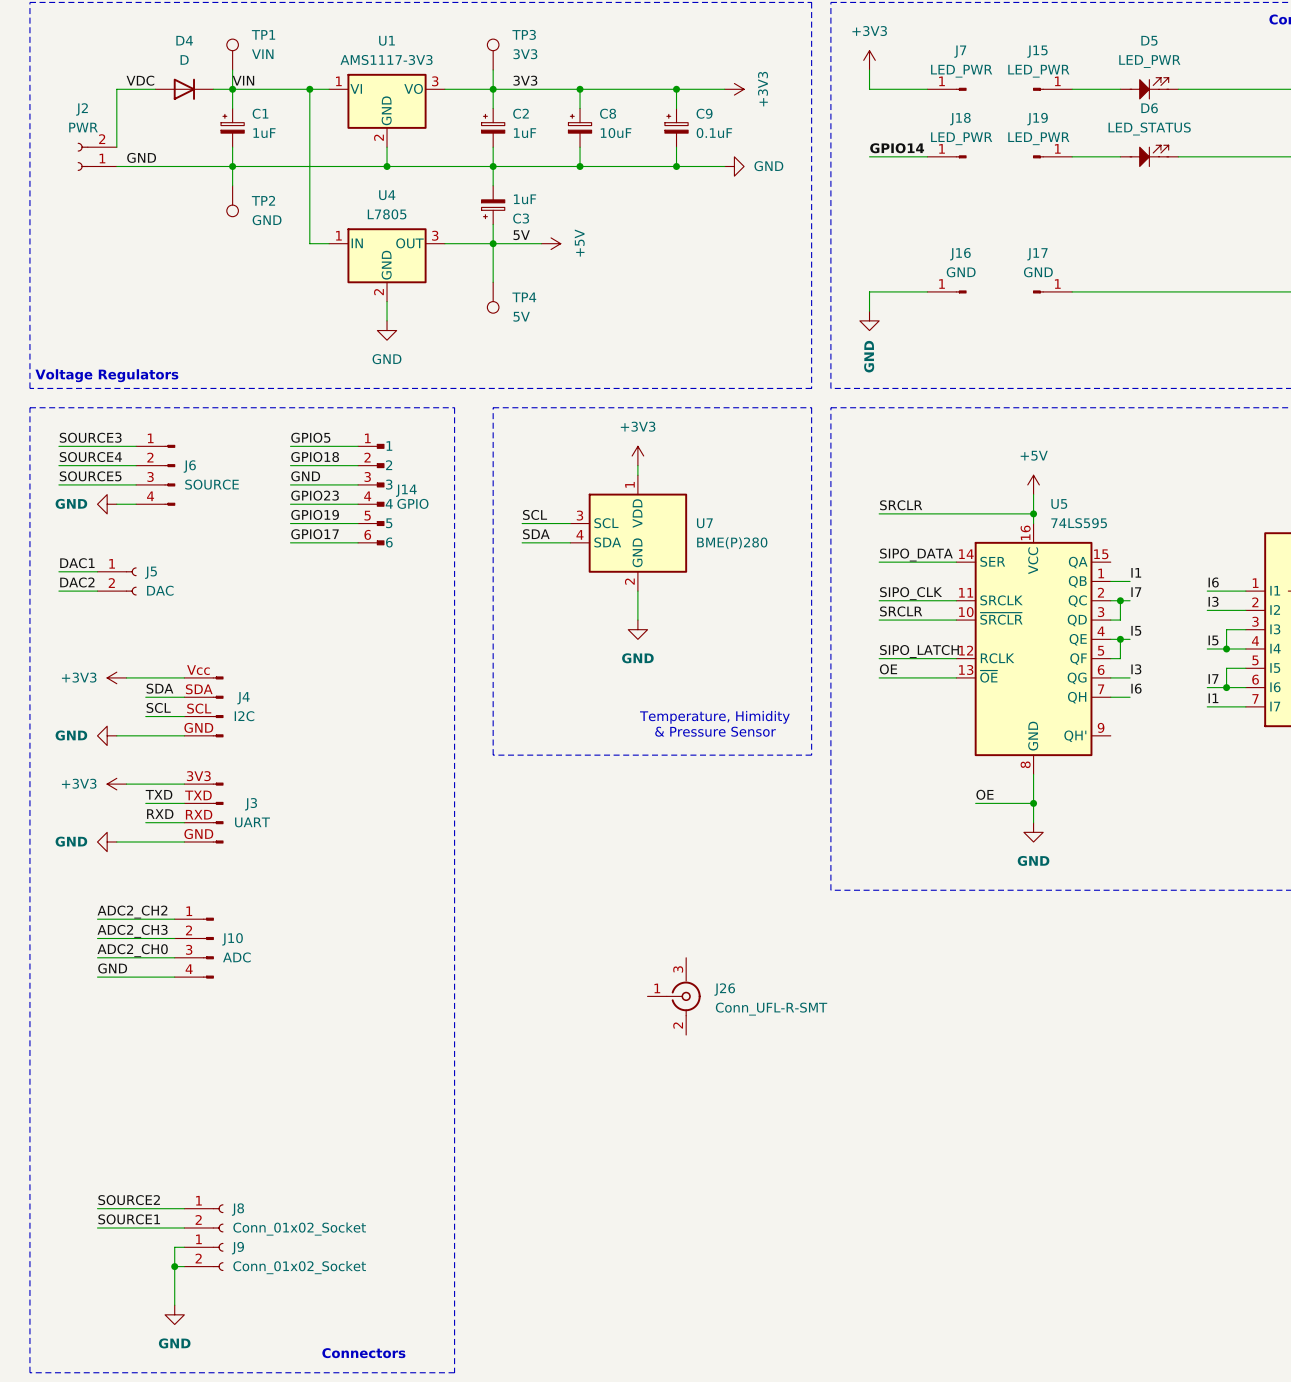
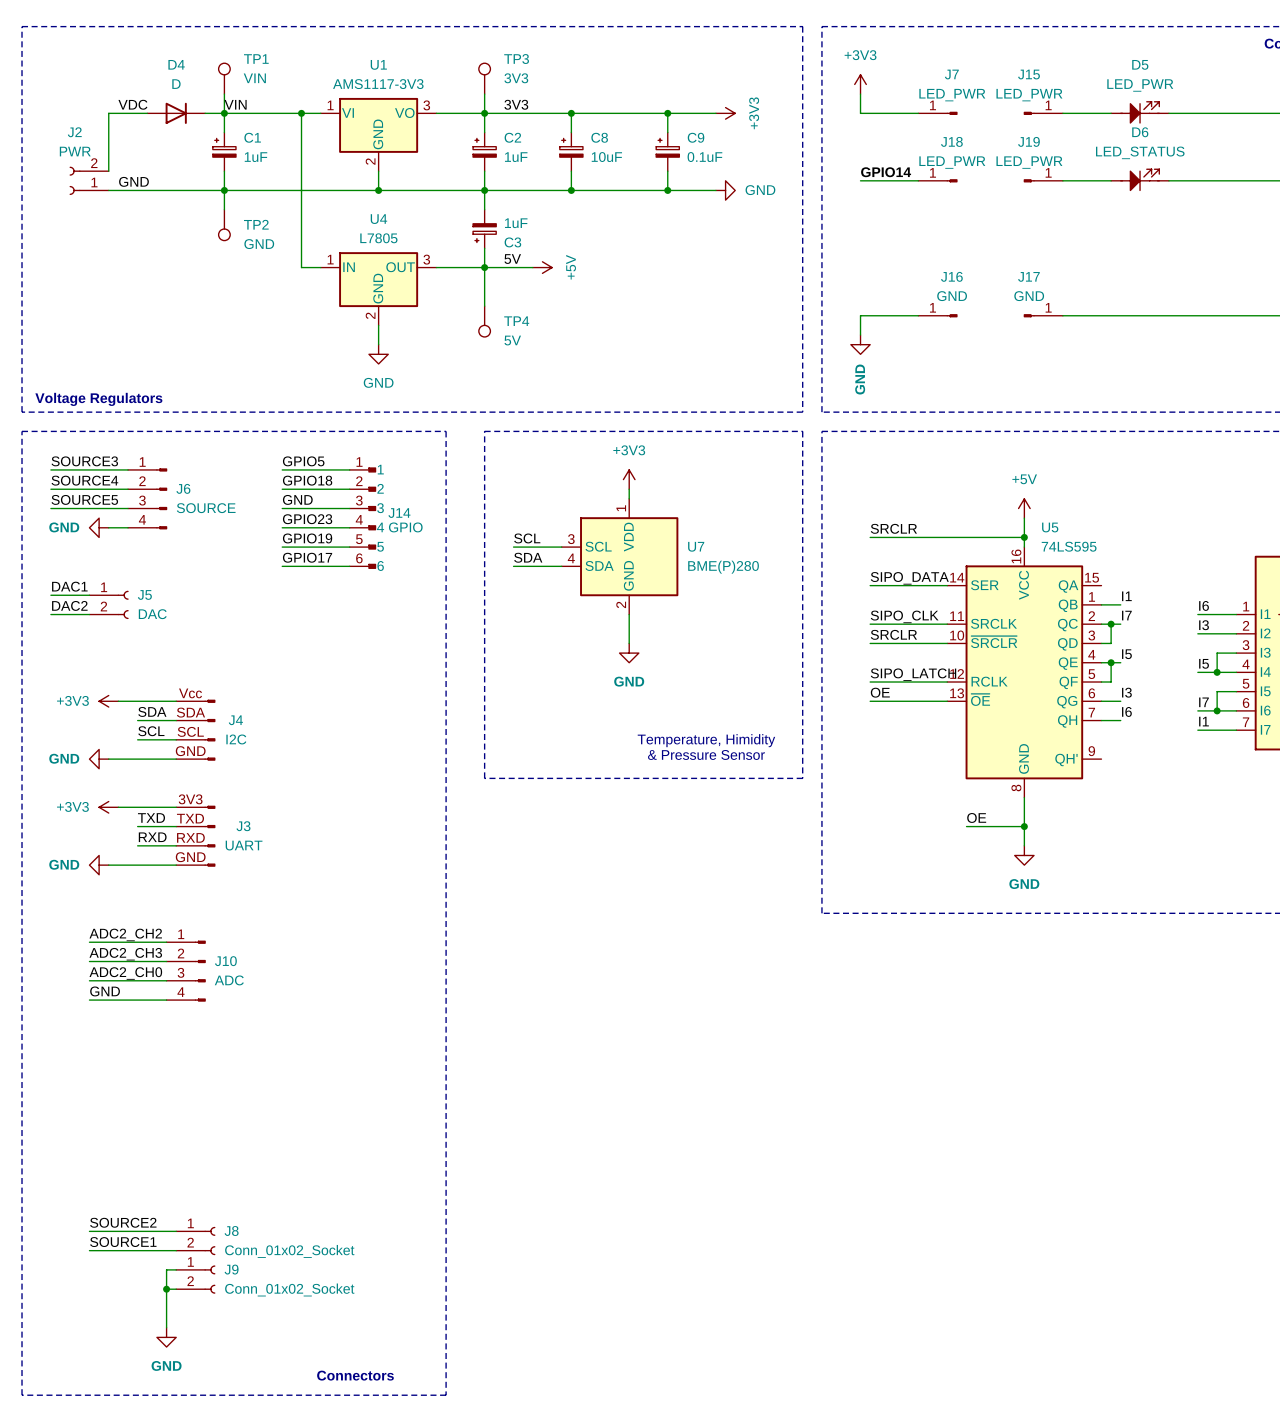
J26: Conn_UFL-R-SMT (674, 996) -> none

